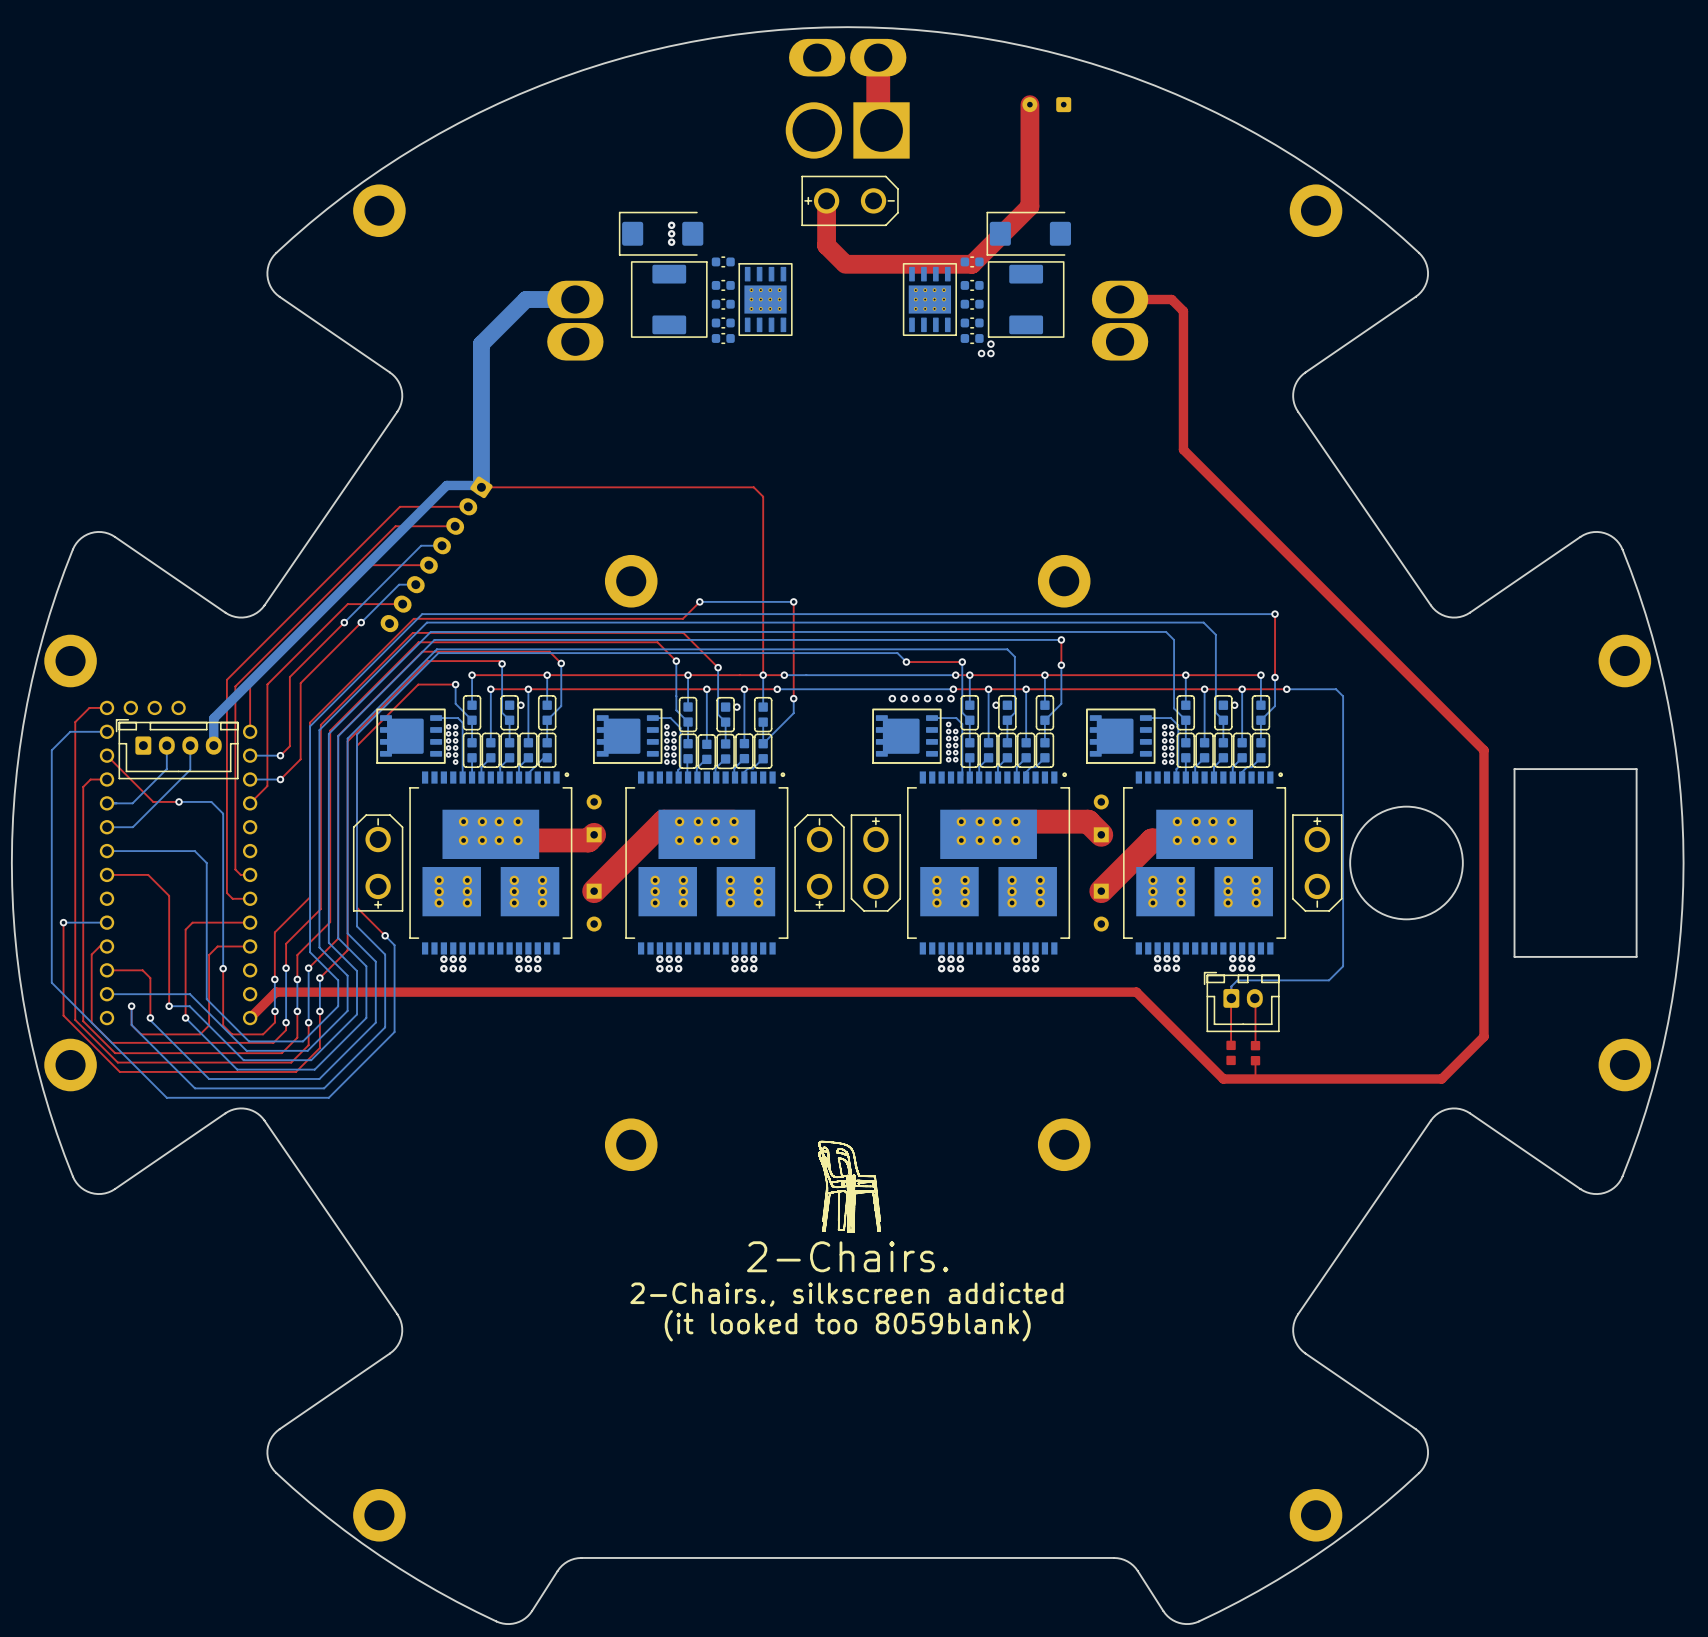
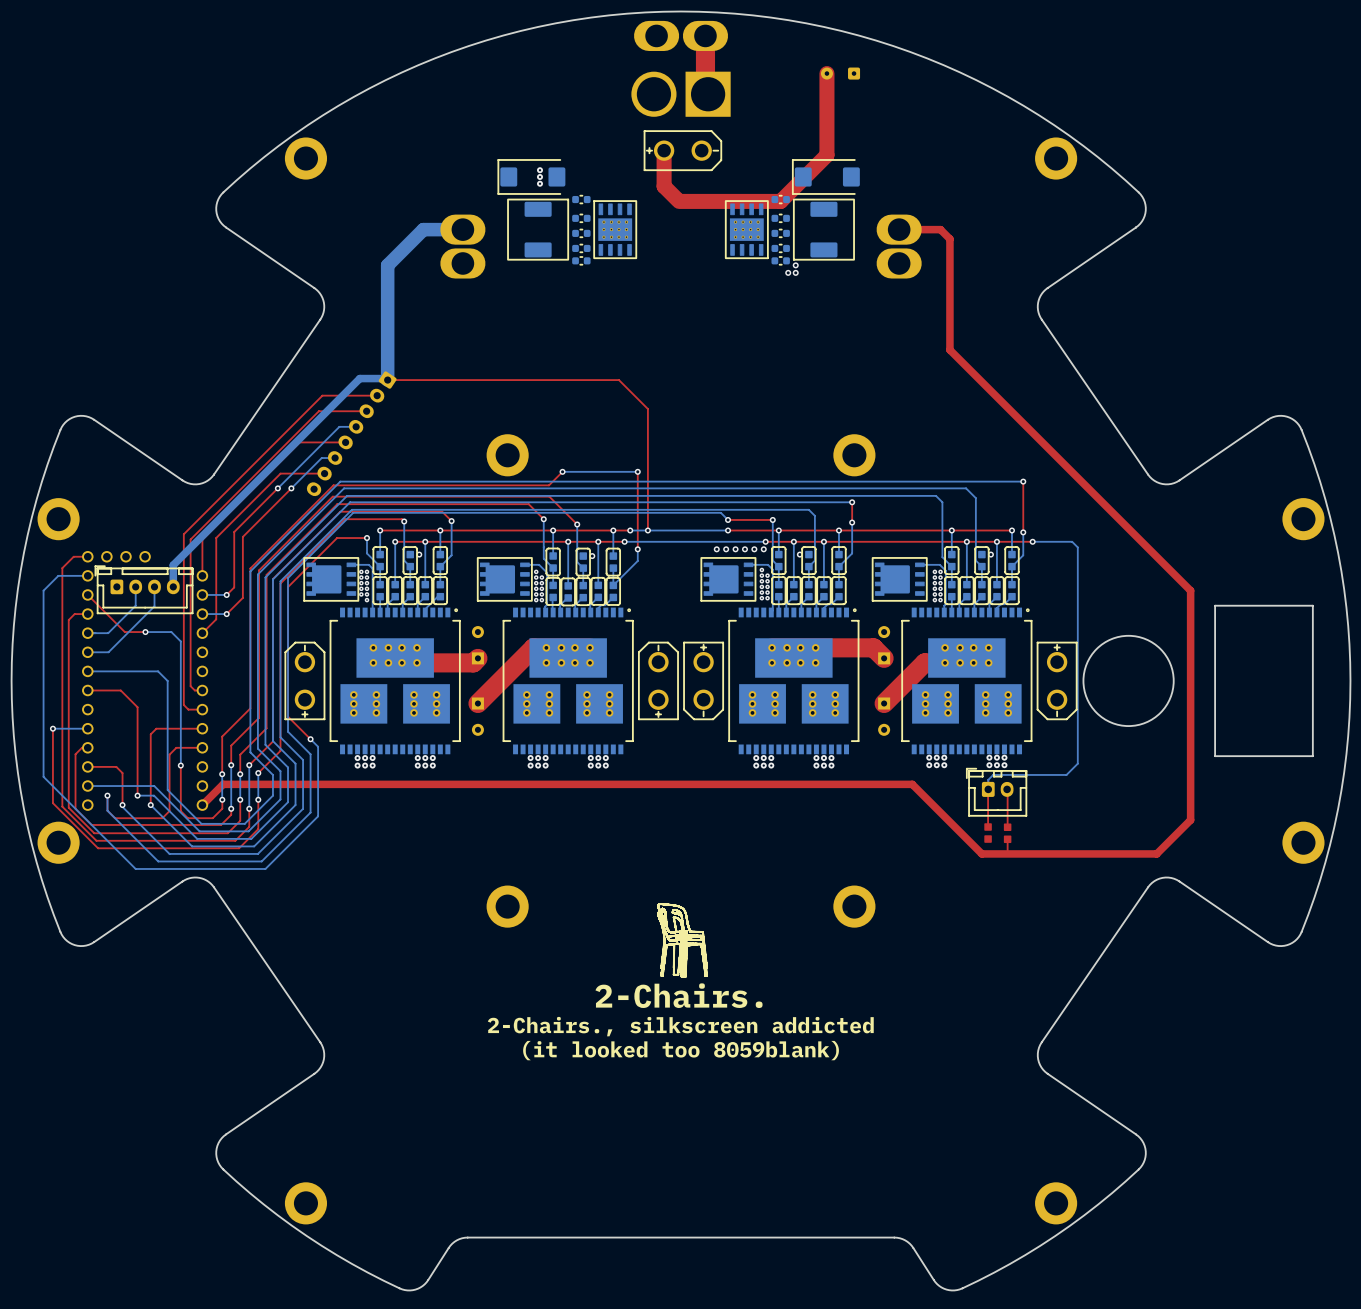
top track: (753, 487) (763, 496) (763, 675) -> (605, 380) (618, 380) (647, 409) (647, 530)
via: none -> (647, 530)
top track: none -> (767, 530) (728, 530)
bottom track: (955, 675) (906, 675) -> none
via position: (955, 675) -> (728, 530)

